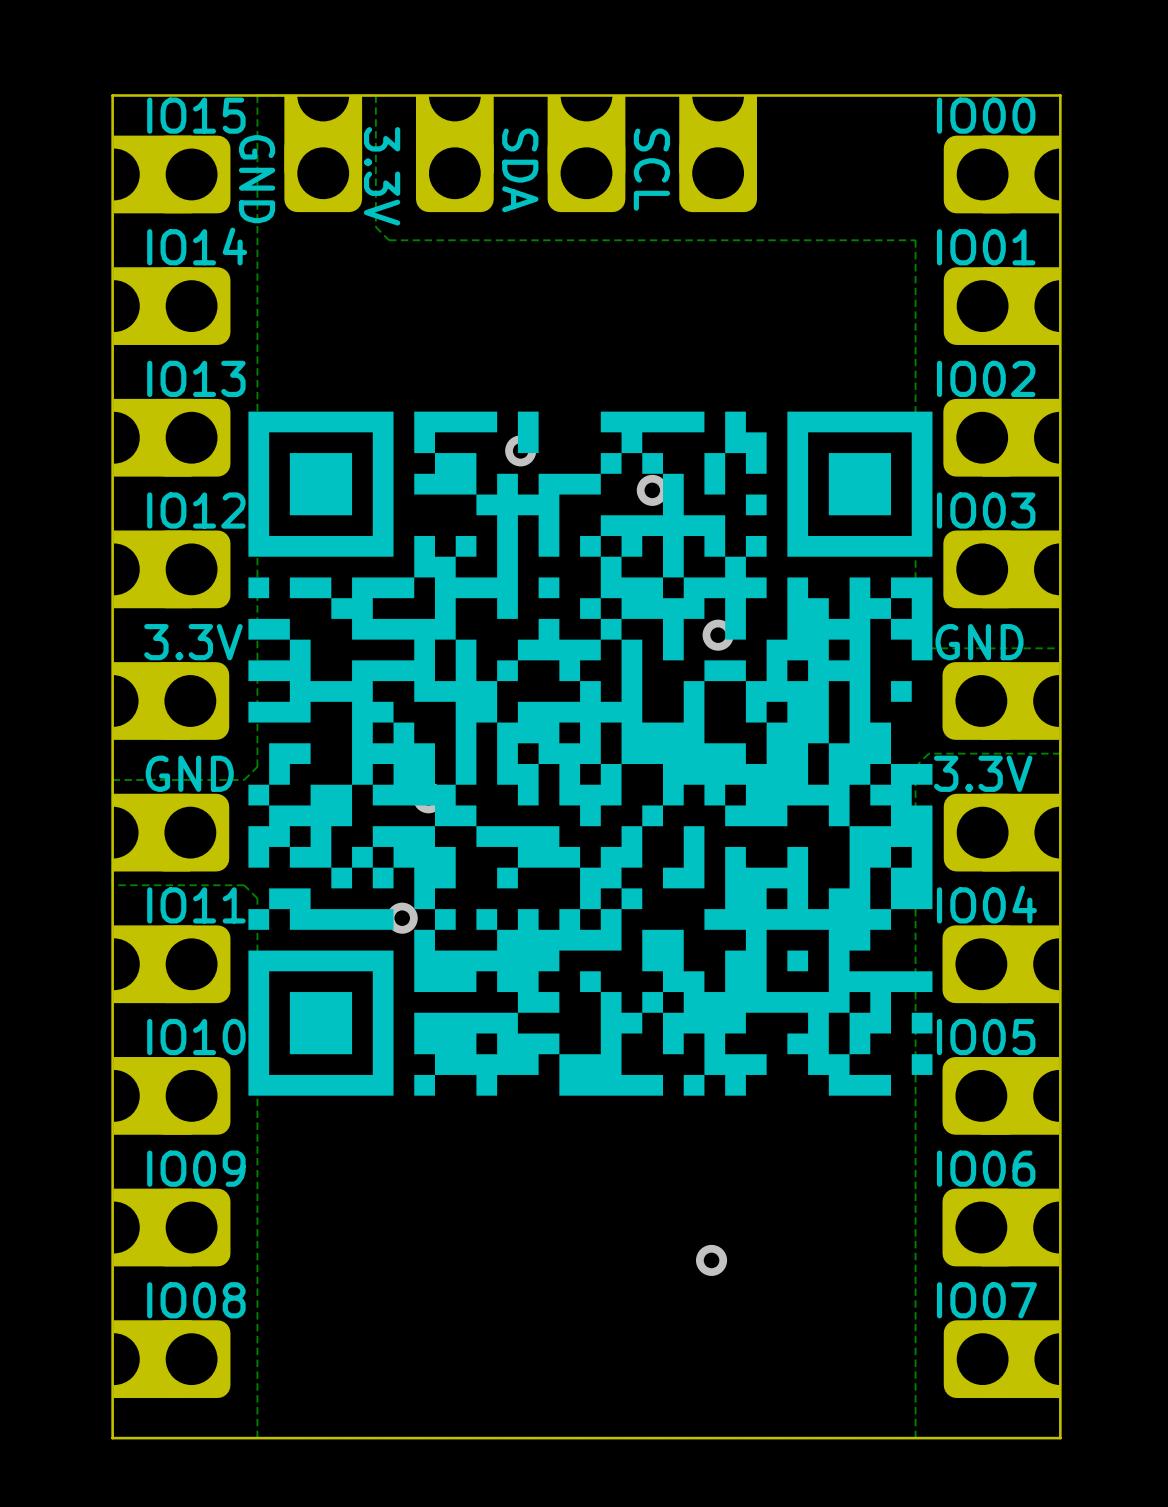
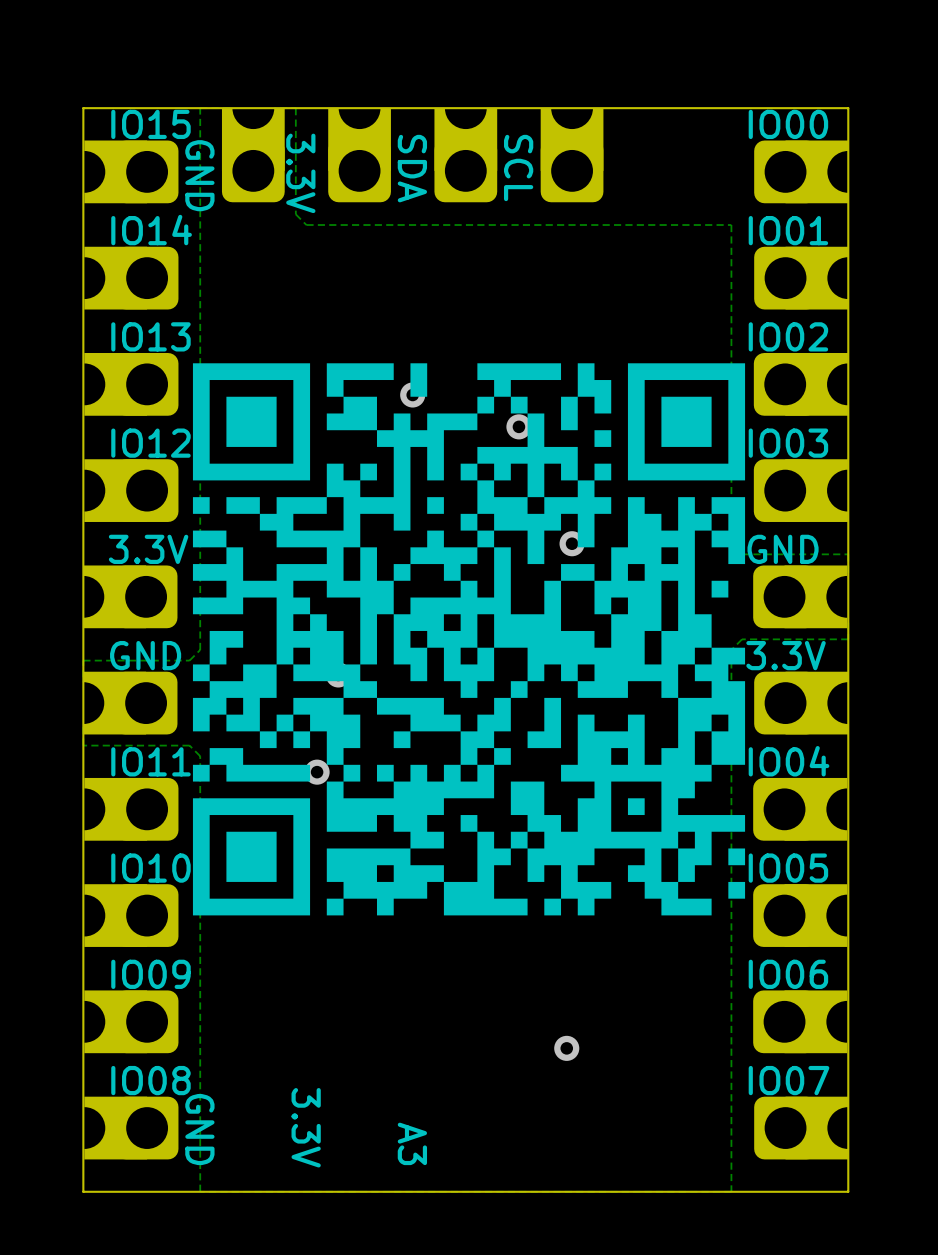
text: none -> 3.3V (306, 1127)
text: none -> GND (199, 1129)
text: none -> A3 (412, 1143)

